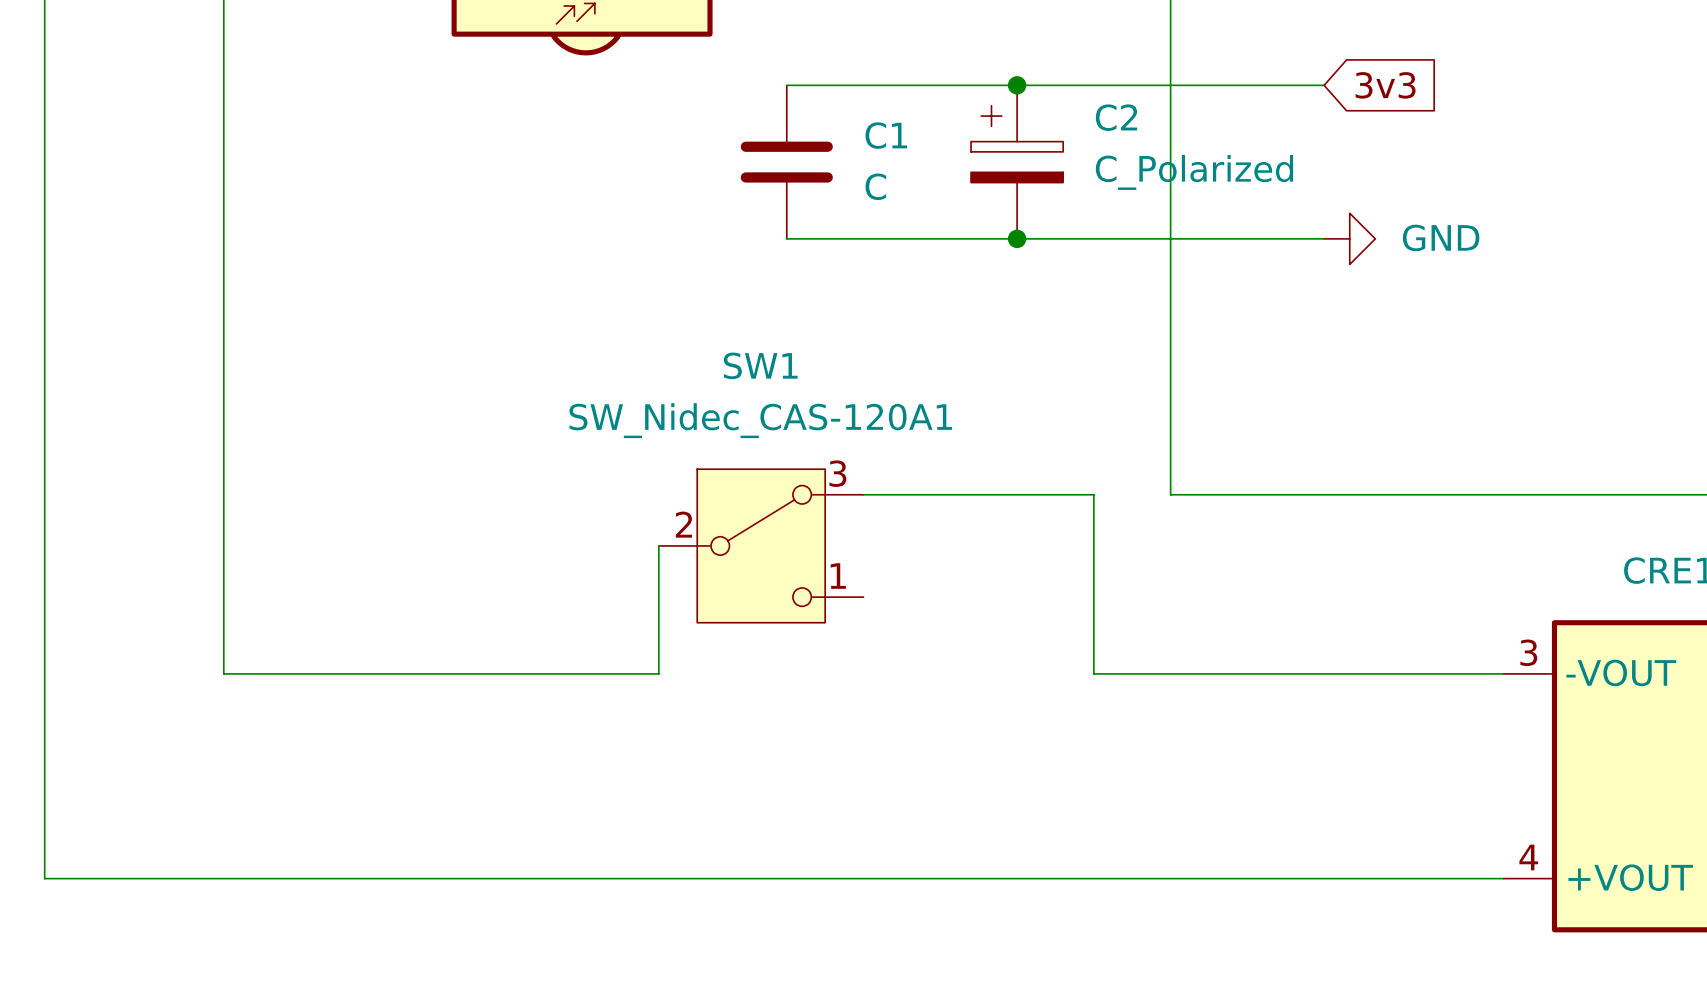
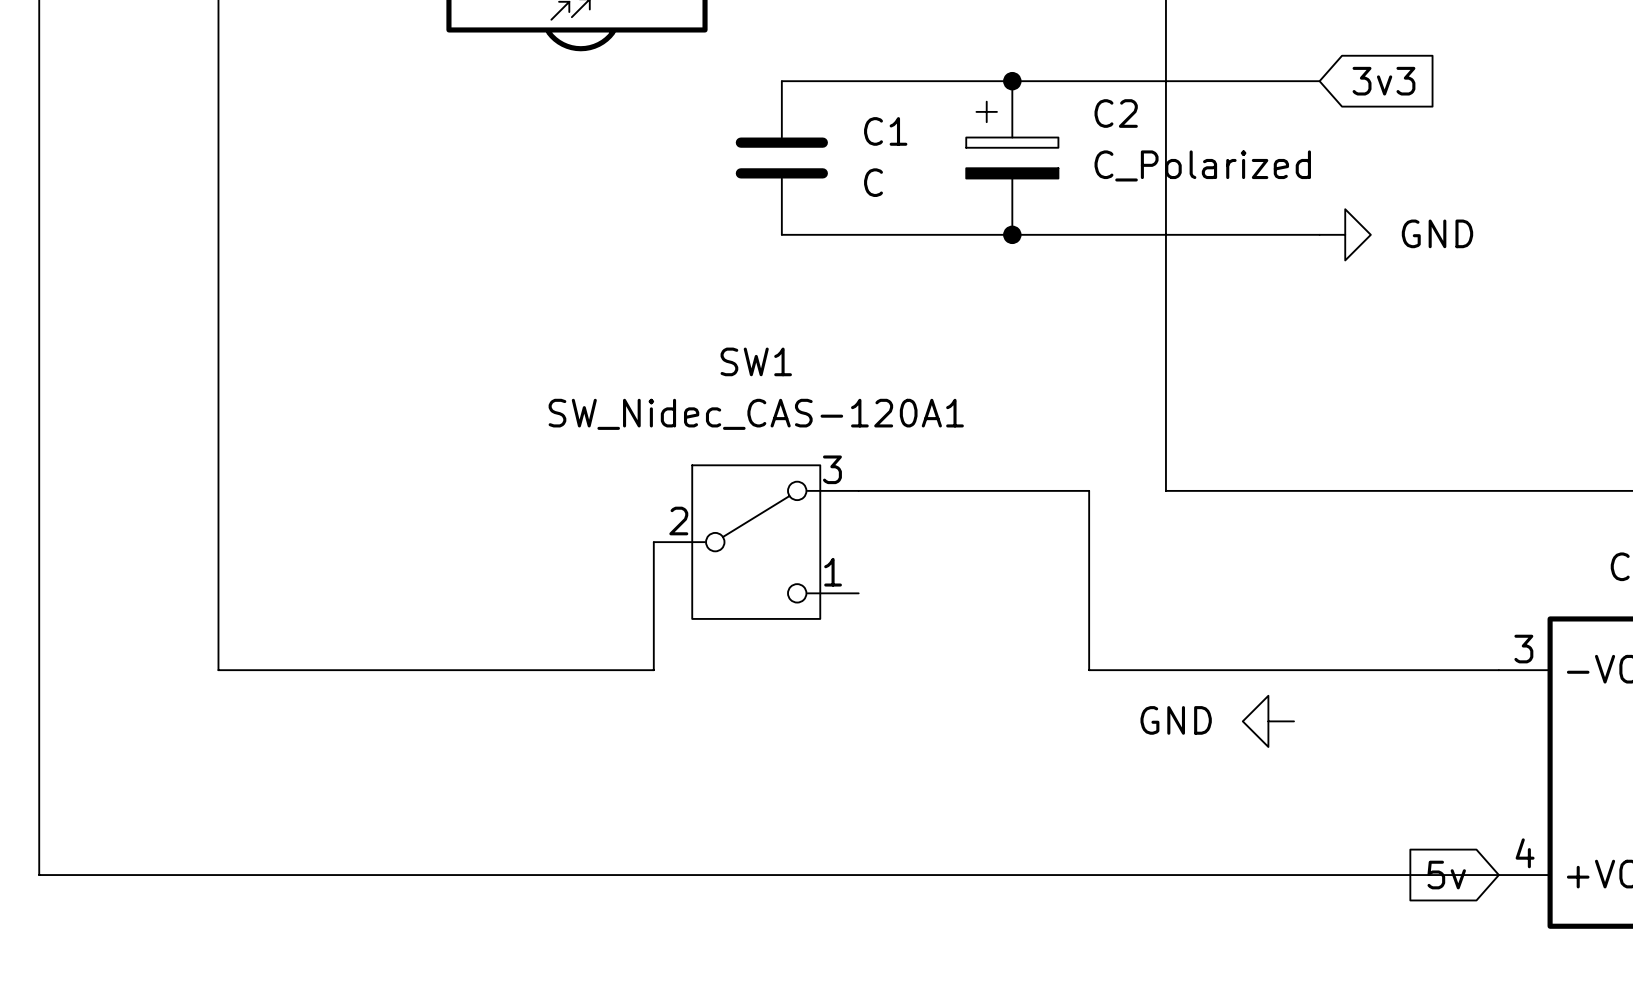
power symbol: none -> GND (1268, 721)
global label: none -> 5v (1446, 875)

